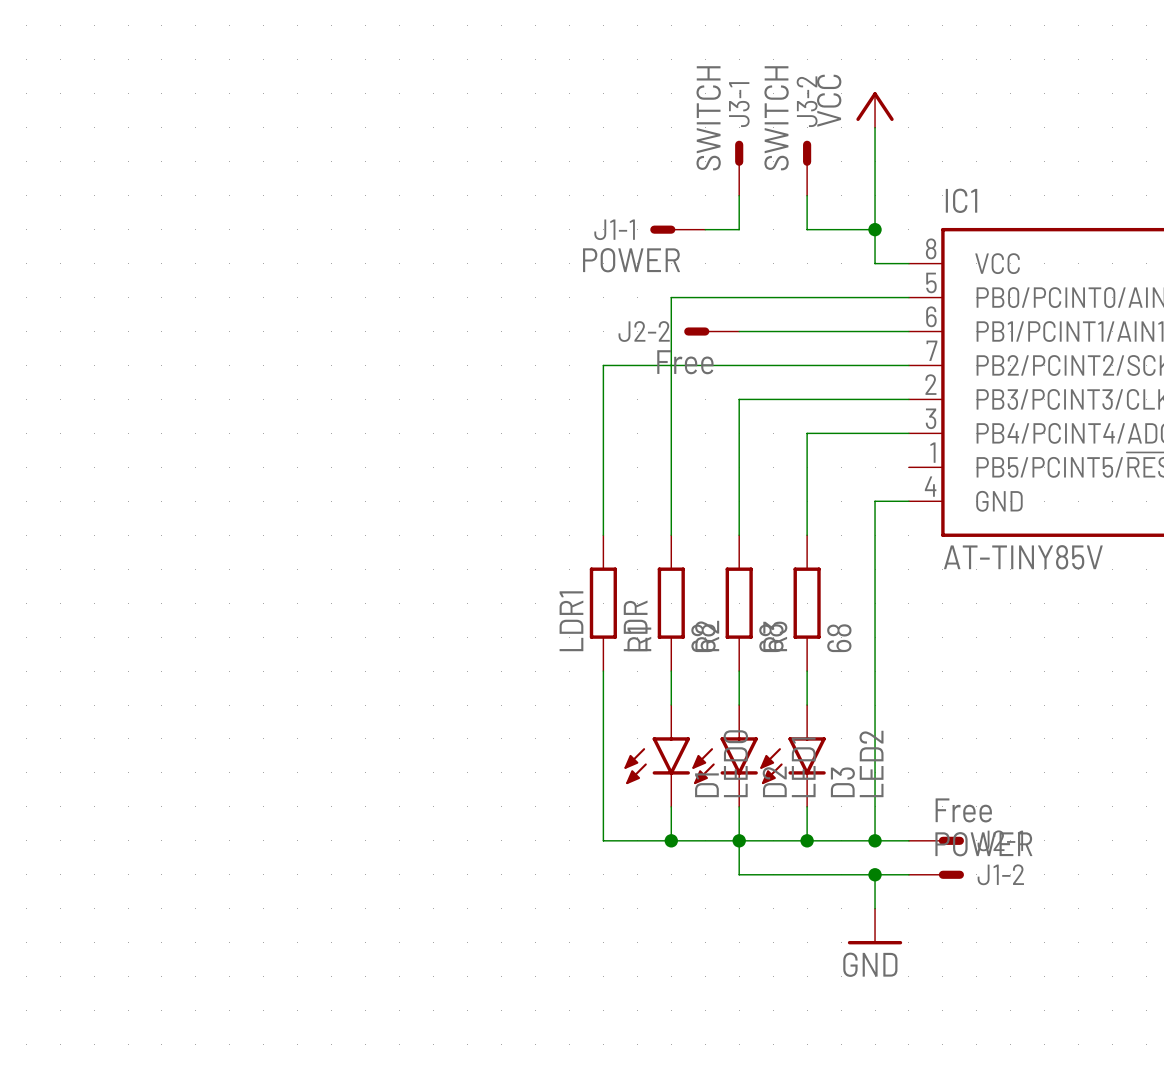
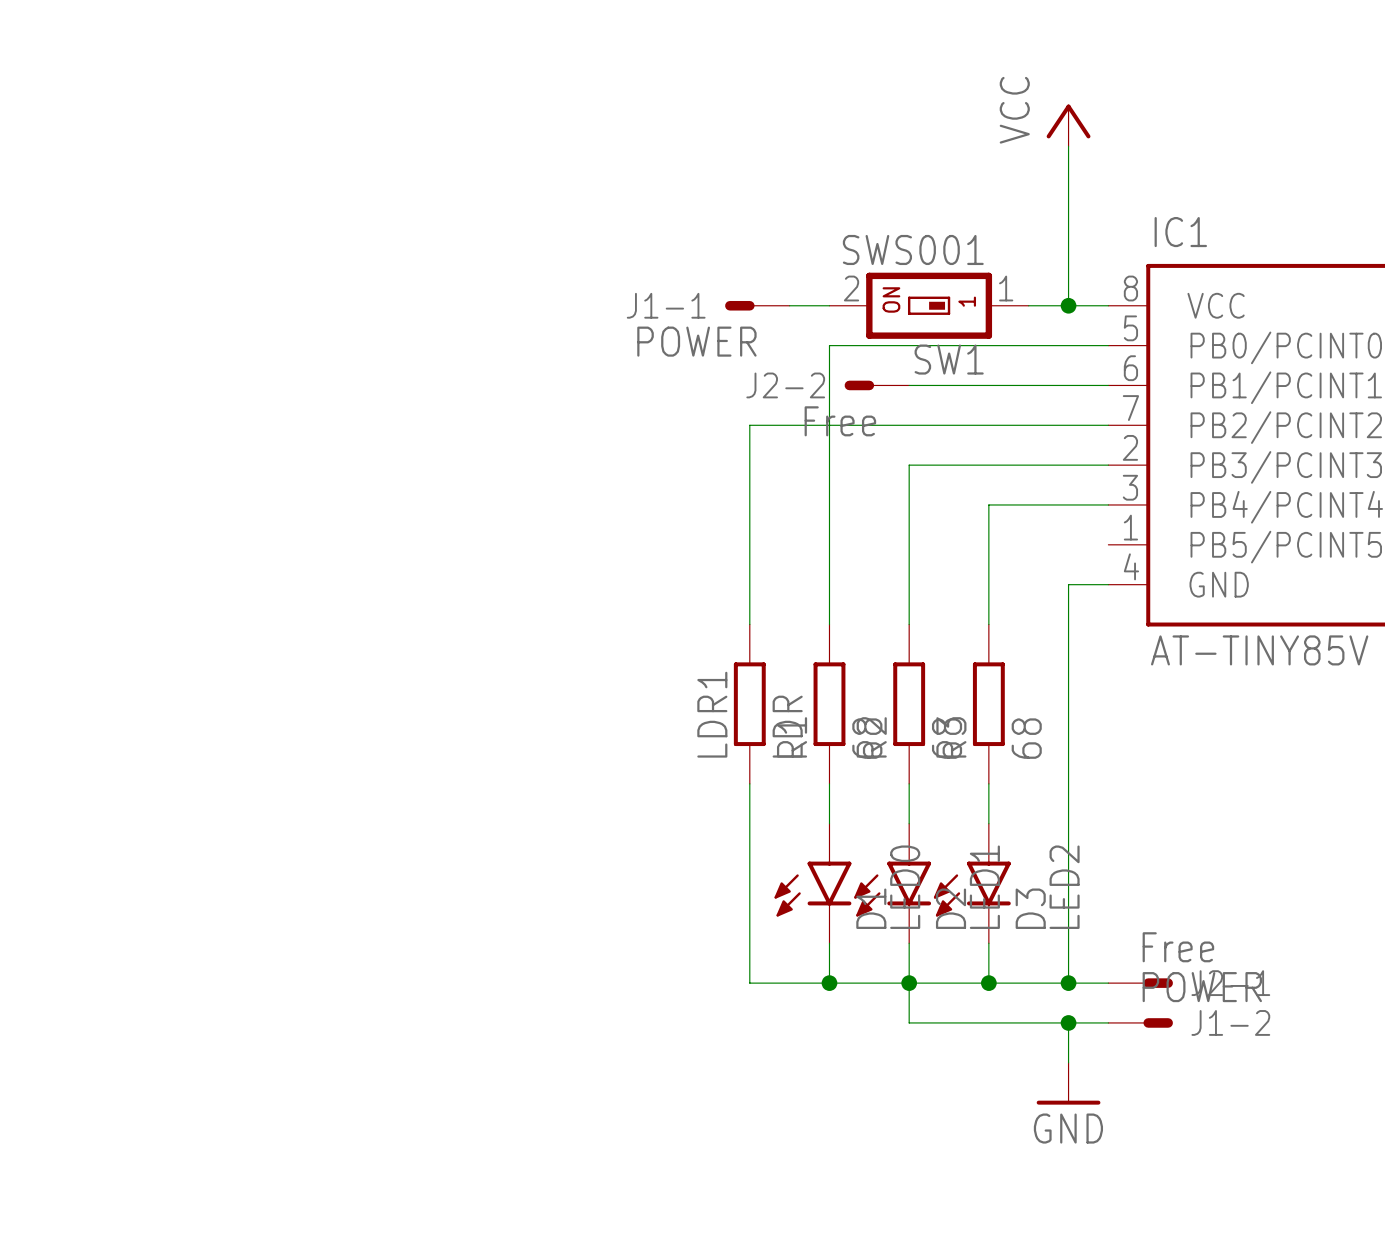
J3-1: SWITCH (739, 168) -> none
J3-2: SWITCH (807, 168) -> none
wire: (739, 195) (739, 229) (705, 229) -> none
wire: (807, 195) (807, 229) (875, 229) -> none
J1-1 position: (677, 229) -> (757, 305)
junction position: (875, 229) -> (1068, 305)
wire: none -> (789, 305) (829, 305)
SW1: none -> SWS001 (929, 305)
wire: none -> (1028, 305) (1068, 305)

